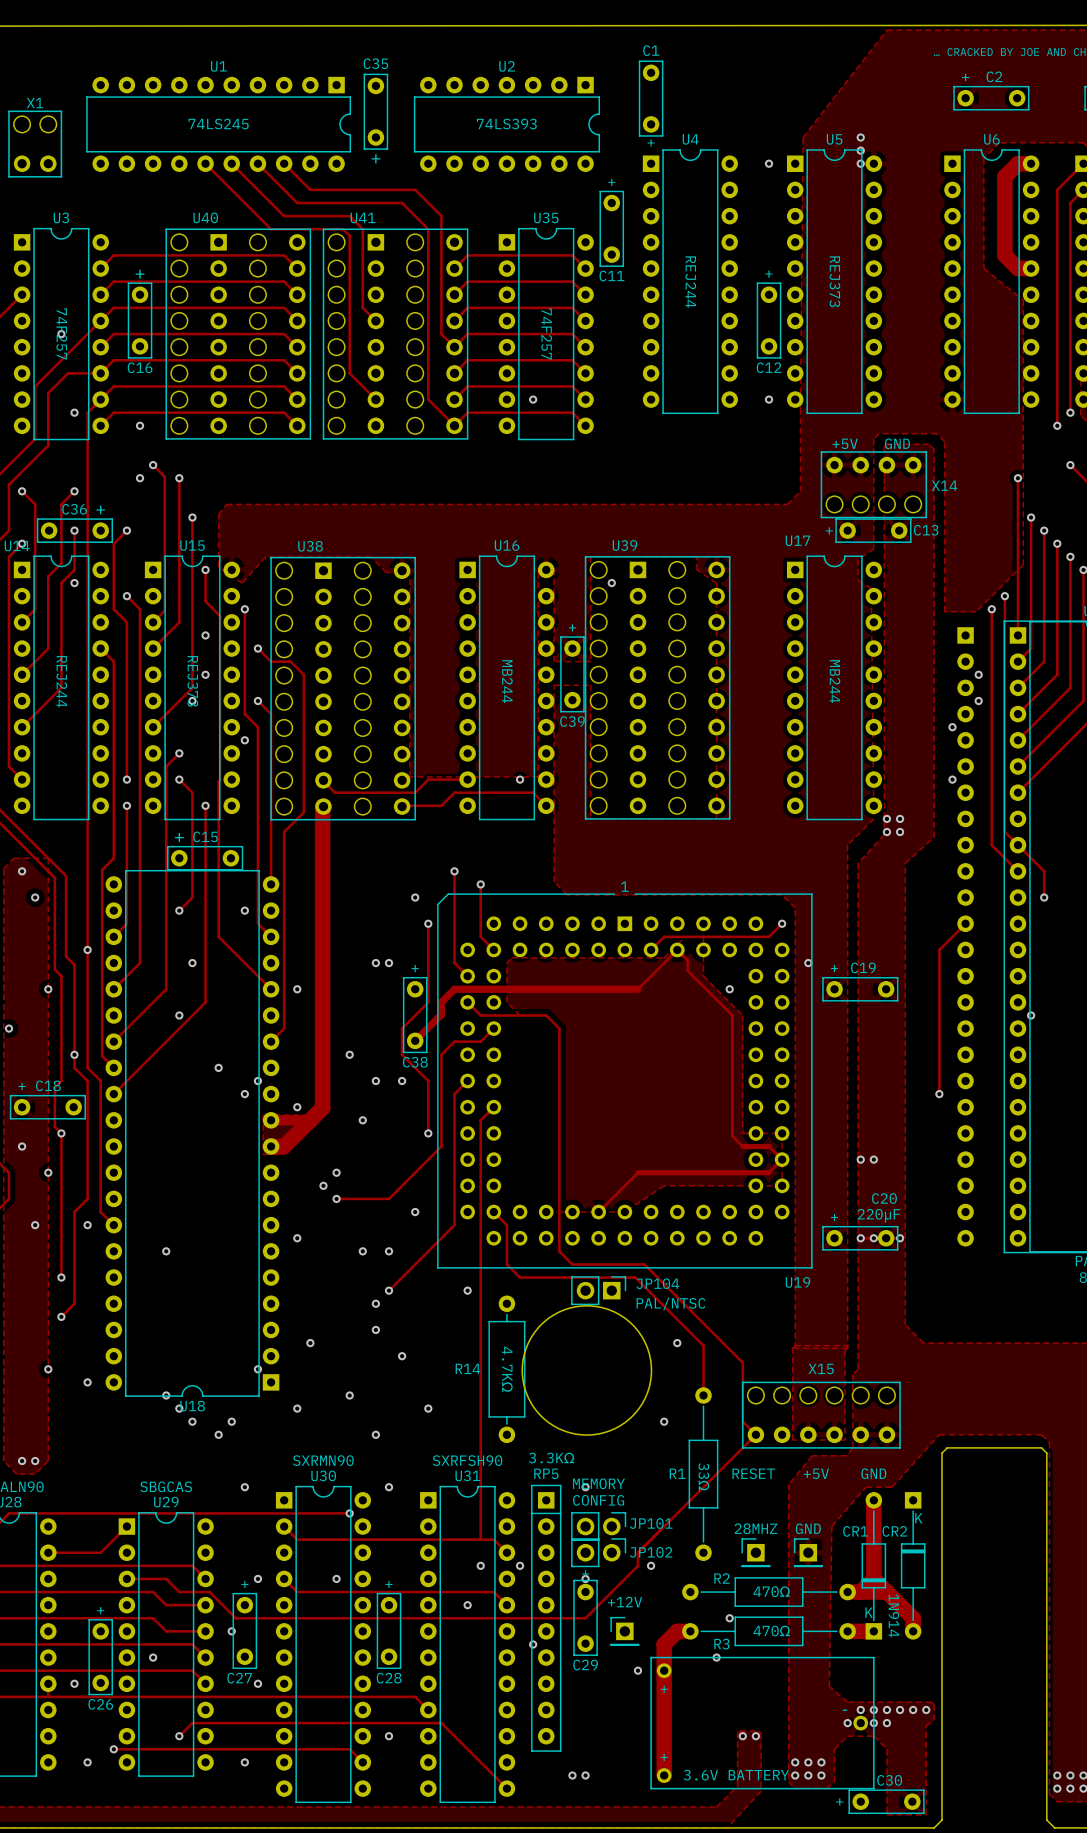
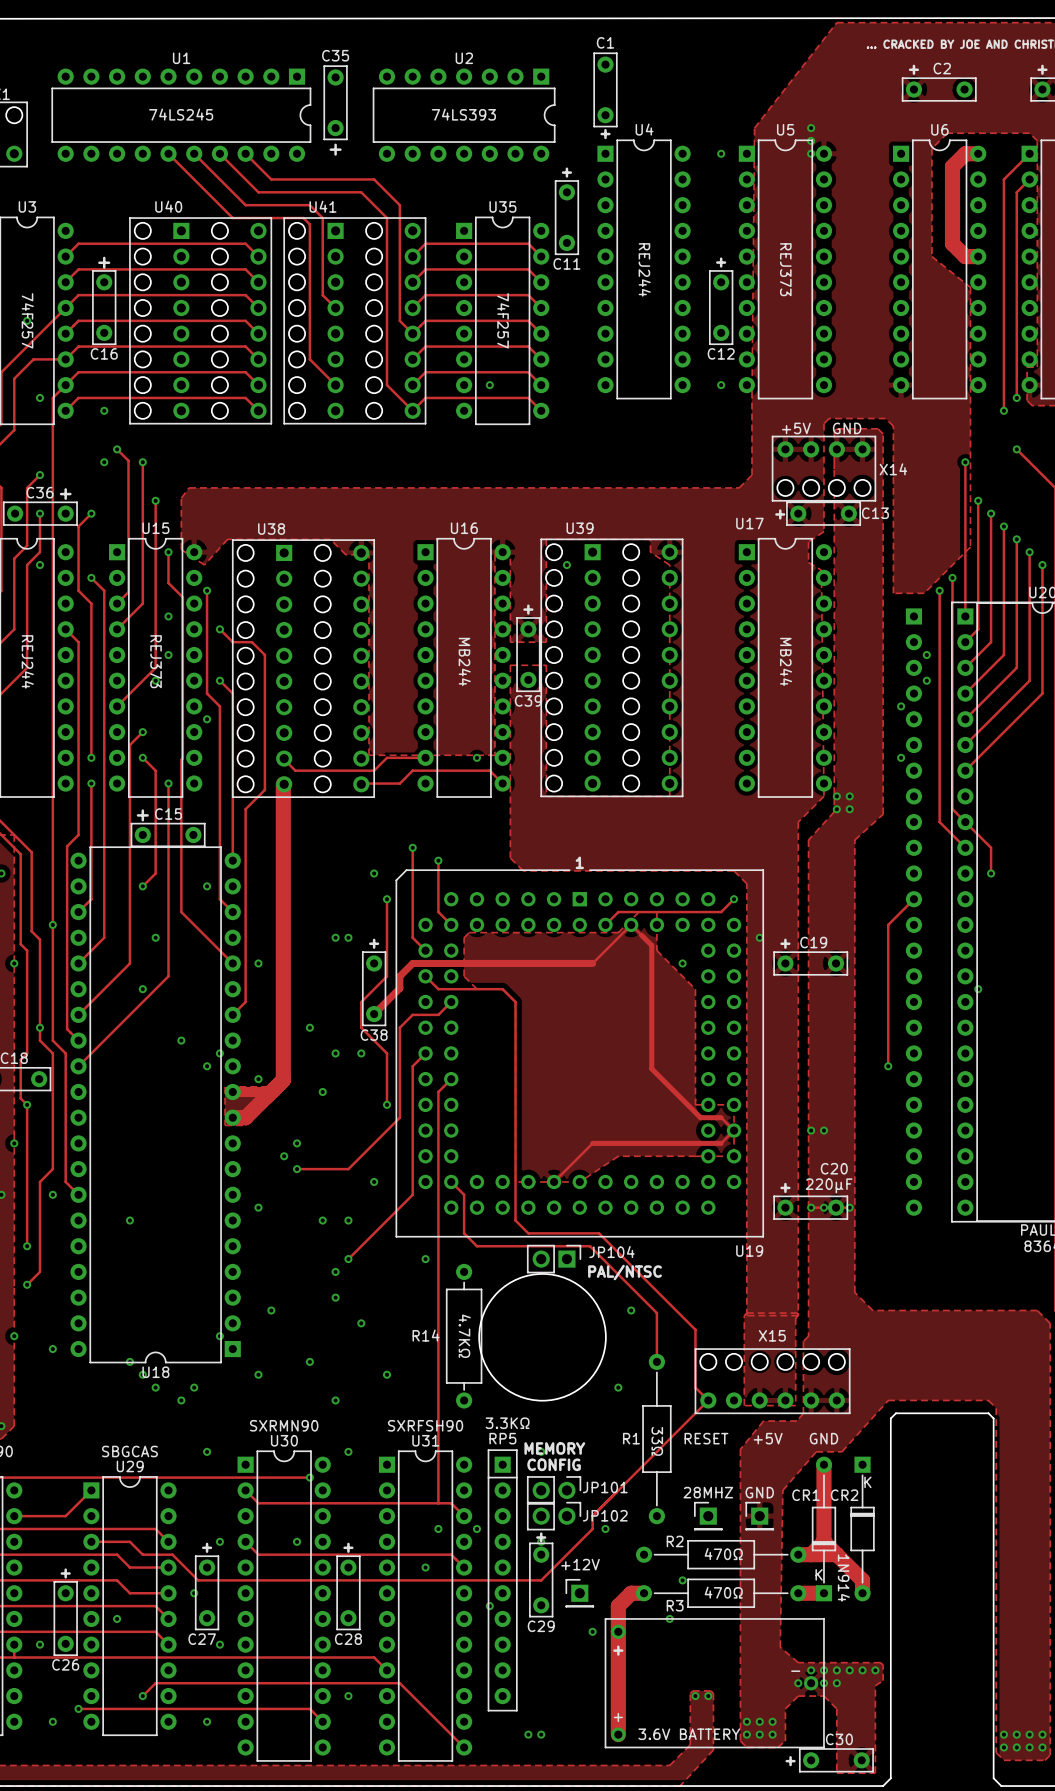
track: (687, 960) (687, 970) (732, 1015) (732, 1136) (742, 1146) (748, 1146) -> (641, 935) (651, 945) (651, 1068) (700, 1117)

